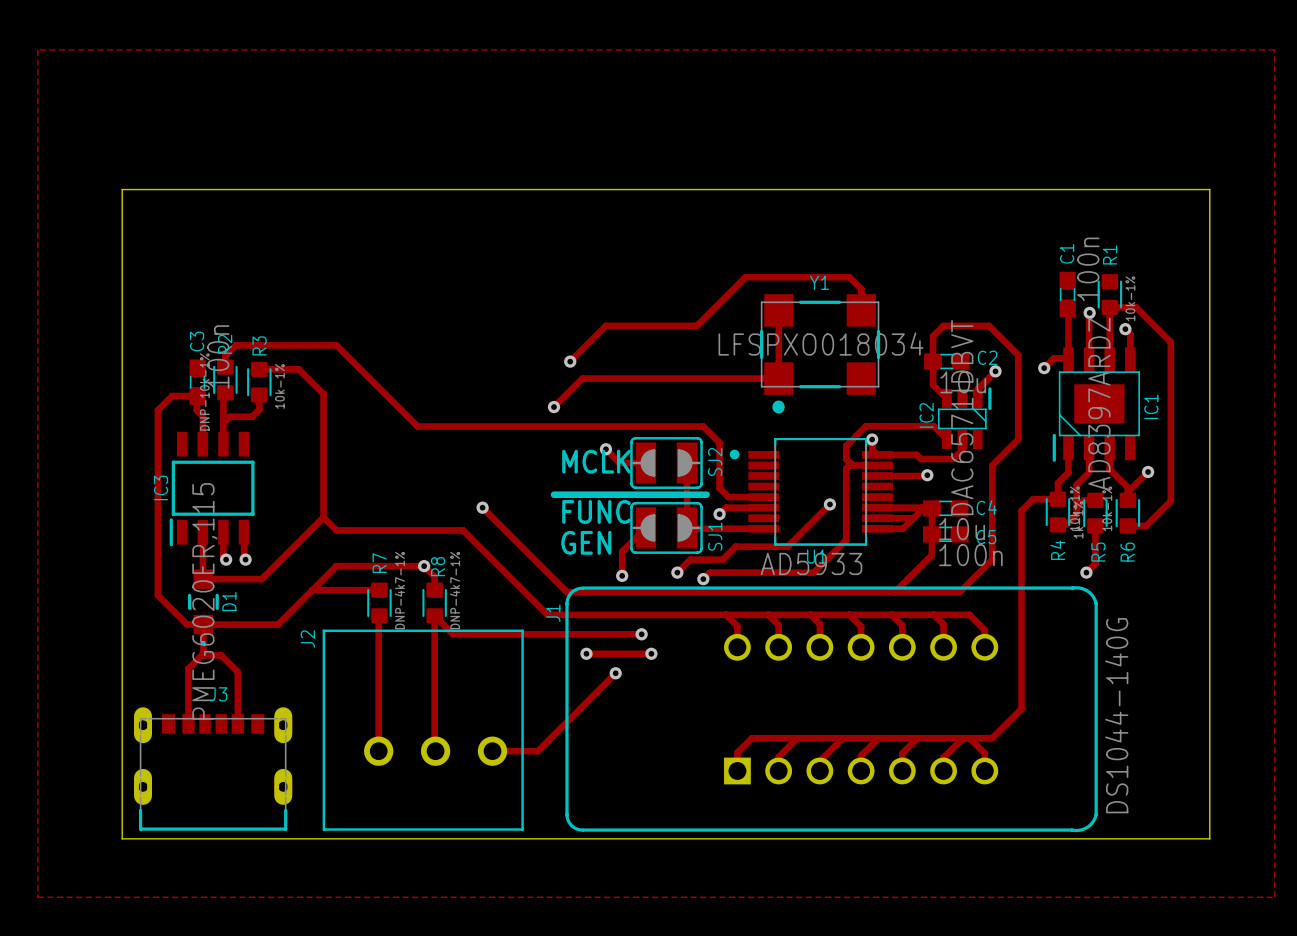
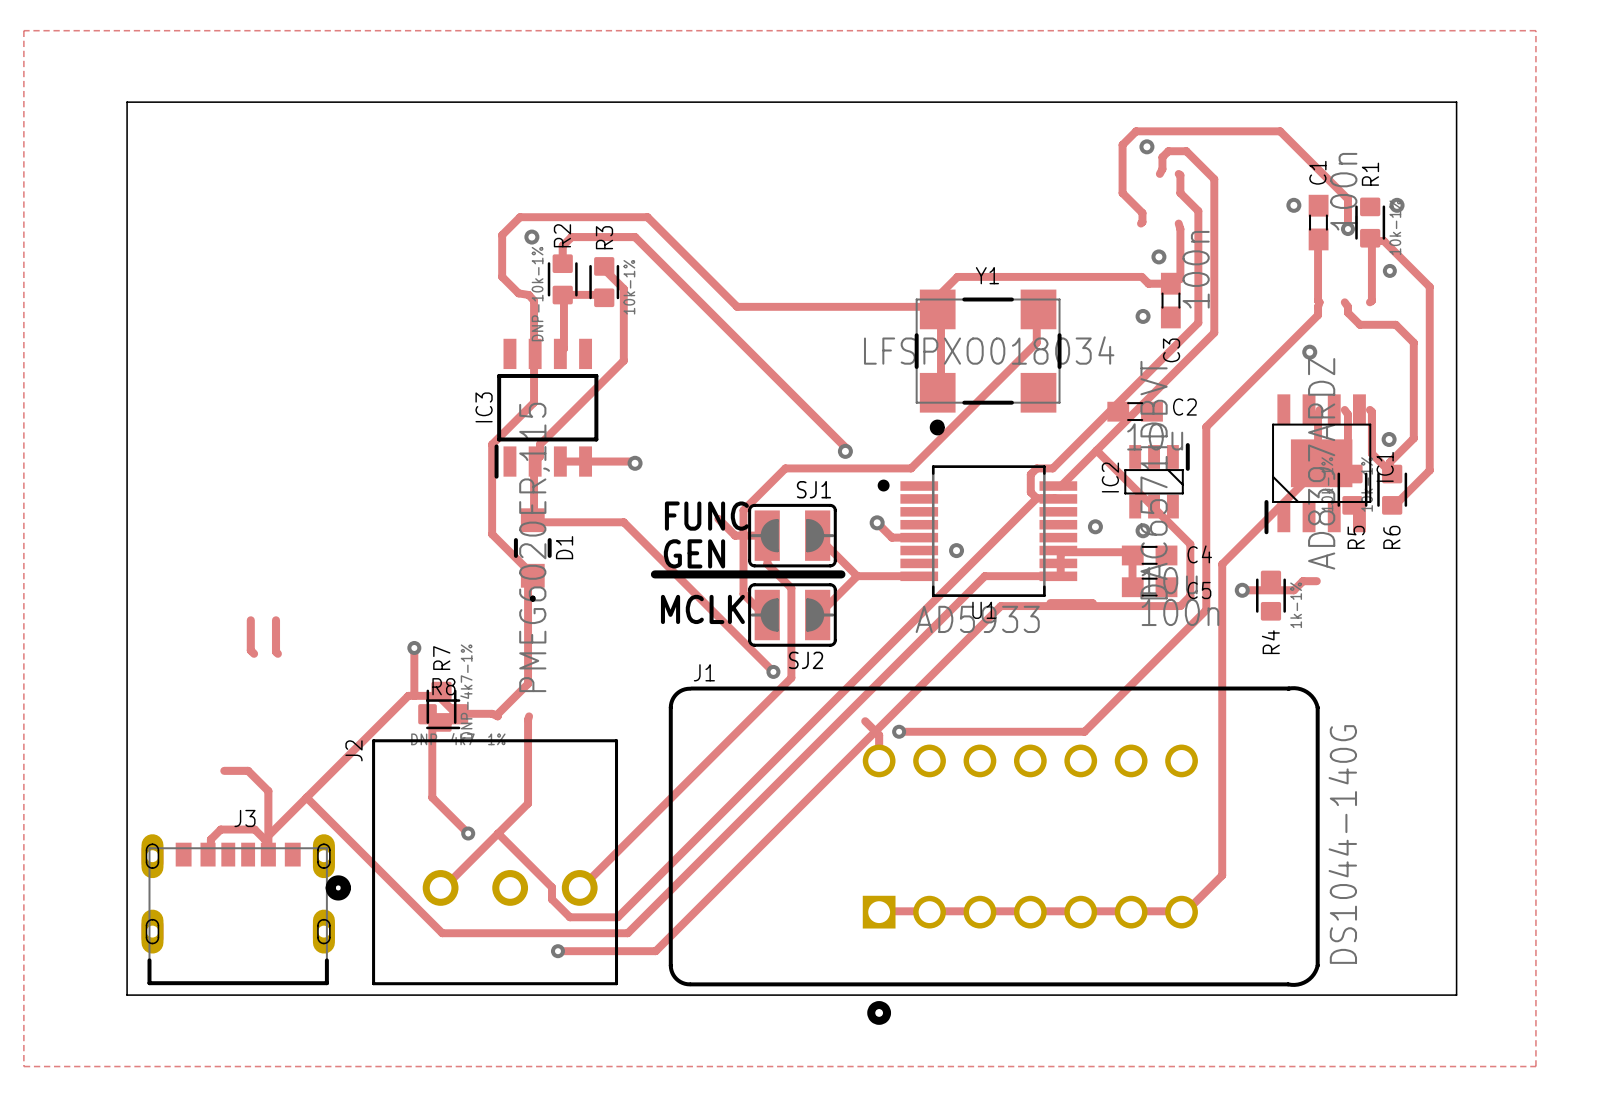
via: none -> (1146, 146)
track: none -> (1159, 173) (1162, 169) (1162, 157) (1168, 151) (1186, 151) (1214, 179) (1214, 332) (1060, 486) (1058, 486)
track: none -> (1178, 173) (1180, 175) (1180, 193) (1198, 211) (1198, 322) (1052, 468) (1036, 468) (1030, 474) (1030, 492) (1036, 498)
board edge: (122, 189) (1209, 189) -> (127, 201) (127, 102) (1456, 102) (1456, 201)
via: none -> (1293, 205)
via: none -> (1397, 205)
track: none -> (1140, 223) (1142, 213) (1122, 193) (1122, 144) (1136, 131) (1280, 131) (1347, 199) (1347, 229)
track: none -> (1178, 223) (1180, 229) (1180, 278) (1170, 283) (1148, 283) (1141, 276) (957, 276) (937, 296) (937, 309)
via: none -> (1347, 229)
via: none -> (531, 237)
track: none -> (1318, 239) (1318, 315) (1206, 426) (1206, 610) (1084, 731) (899, 731)
track: none -> (1371, 241) (1383, 241) (1429, 286) (1429, 470) (1395, 504) (1392, 505)
track: none -> (1371, 241) (1371, 300) (1369, 302)
via: none -> (1158, 256)
track: none -> (562, 263) (562, 245) (571, 237) (635, 237) (845, 447) (845, 451)
track: none -> (604, 266) (605, 270) (623, 288) (623, 360) (540, 444) (540, 456) (534, 462) (532, 520) (534, 522) (623, 522) (773, 671)
via: none -> (1389, 270)
track: none -> (604, 297) (599, 294) (562, 295) (563, 348) (560, 353)
track: none -> (1344, 302) (1347, 306) (1347, 312) (1359, 324) (1395, 324) (1413, 342) (1413, 438) (1389, 462) (1392, 474) (1371, 453) (1371, 411) (1369, 409)
track: none -> (937, 309) (941, 312) (941, 390) (937, 392)
via: none -> (1143, 316)
C1 position: (1067, 294) -> (1318, 222)
R1 position: (1109, 294) -> (1370, 222)
track: (1109, 307) (1136, 307) (1170, 342) (1170, 501) (1146, 525) (1127, 525) -> none
track: (1109, 307) (1109, 359) -> none
track: (1067, 308) (1068, 359) -> none
track: (778, 310) (778, 378) (582, 378) (554, 407) -> none
track: (861, 310) (861, 289) (849, 277) (745, 277) (696, 325) (605, 325) (570, 361) -> none
track: (1089, 312) (1089, 359) -> none
track: (1125, 329) (1130, 334) (1130, 359) -> none
via: (1125, 329) -> none
C3 name position: C3 (197, 341) -> C3 (1171, 350)
Y1 position: (820, 353) -> (988, 362)
track: (1068, 358) (1053, 358) (1044, 368) -> none
track: none -> (1344, 409) (1347, 414) (1347, 468) (1352, 474)
via: (570, 361) -> none
track: (225, 367) (225, 355) (235, 345) (336, 345) (417, 426) (703, 426) (719, 442) (719, 488) (728, 497) (763, 497) -> none
via: (1044, 368) -> none
track: (259, 369) (298, 369) (323, 394) (323, 517) -> none
track: (995, 371) (977, 389) (977, 398) -> none
via: (995, 371) -> none
R2 position: (225, 379) -> (562, 279)
C3 position: (197, 382) -> (1170, 300)
R3 position: (259, 382) -> (604, 282)
via: none -> (1389, 439)
track: (225, 392) (223, 394) (223, 444) -> none
track: none -> (1096, 450) (1190, 544) (1190, 596) (1180, 606) (1000, 606) (655, 951) (557, 951)
via: none -> (845, 451)
track: (259, 395) (259, 409) (252, 416) (229, 416) (223, 423) -> none
track: (946, 398) (933, 384) (933, 336) (943, 325) (989, 325) (1018, 355) (1018, 439) (992, 465) (992, 559) (959, 592) (566, 592) (482, 507) -> none
track: none -> (560, 461) (633, 461) (635, 463)
via position: (554, 407) -> (635, 463)
track: none -> (1036, 498) (617, 917) (569, 917) (551, 899) (551, 887) (498, 833)
via: (872, 439) -> none
track: (946, 439) (933, 426) (865, 426) (846, 446) (846, 459) (852, 465) (877, 465) -> none
track: (962, 439) (962, 450) (953, 459) (920, 459) (916, 454) (877, 454) (872, 449) (872, 439) -> none
track: (202, 444) (202, 416) (196, 410) (197, 396) (172, 396) (157, 410) (157, 595) (187, 624) (278, 624) (336, 566) (424, 566) (434, 576) (434, 590) -> none
track: (1068, 447) (1068, 472) (1057, 483) (1057, 499) (1033, 499) (1021, 510) (1021, 708) (992, 738) (752, 738) (737, 752) (737, 770) -> (1319, 409) (1318, 468) (1222, 564) (1222, 875) (1186, 911) (1181, 912) (879, 912)
track: (1089, 447) (1089, 472) (1076, 484) (1076, 514) (1065, 524) (1057, 524) -> none
track: (1109, 447) (1109, 469) (1127, 487) (1127, 500) -> none
via: (605, 449) -> none
track: none -> (877, 522) (891, 537) (919, 537)
via: none -> (877, 522)
via: none -> (1095, 526)
via: none -> (1143, 530)
text position: MCLK (596, 461) -> MCLK (702, 609)
track: (687, 462) (687, 528) (763, 528) -> (817, 535) (857, 576)
SJ2 name rotation: 0° (715, 462) -> 90° clockwise (806, 660)
SJ2 name position: SJ2 (715, 462) -> SJ2 (806, 660)
track: (851, 463) (846, 468) (846, 540) (813, 572) (709, 572) (703, 579) -> none
track: (1148, 471) (1127, 492) -> none
via: (1148, 471) -> none
via: none -> (956, 550)
track: (927, 475) (877, 475) -> none
via: (927, 475) -> none
IC3 position: (212, 489) -> (546, 408)
U1 position: (811, 491) -> (977, 531)
track: none -> (857, 576) (919, 576)
track: none -> (857, 576) (817, 615)
track: (829, 504) (787, 546) (735, 546) (722, 559) (690, 559) (677, 572) -> none
via: (829, 504) -> none
track: none -> (1132, 587) (1132, 552) (1060, 552) (1060, 576) (984, 576) (627, 933) (442, 933) (306, 797)
via: (482, 507) -> none
track: (763, 507) (726, 507) (719, 514) -> none
track: (877, 507) (923, 508) -> none
track: none -> (1242, 590) (1293, 590)
via: none -> (1242, 590)
track: (923, 508) (931, 508) (931, 555) (894, 592) -> none
track: (923, 508) (903, 528) (877, 528) -> none
C4 position: (945, 508) -> (1149, 555)
text position: FUNC (596, 511) -> FUNC (706, 516)
R5 position: (1095, 513) -> (1352, 489)
R6 position: (1127, 513) -> (1392, 489)
via: (719, 514) -> none
track: (323, 517) (261, 579) (203, 579) (202, 532) -> none
track: (323, 517) (336, 530) (463, 530) (547, 614) (969, 614) (984, 630) (984, 647) -> none
track: (1095, 525) (1095, 563) (1086, 572) -> none
track: (645, 527) (622, 551) (622, 575) -> (767, 615) (761, 612) (743, 594) (743, 510) (785, 468) (911, 468) (1036, 342) (1036, 312) (1038, 309)
C5 position: (945, 534) -> (1149, 587)
SJ1 name rotation: 0° (715, 536) -> 90° clockwise (813, 489)
SJ1 name position: SJ1 (715, 536) -> SJ1 (813, 489)
text position: GEN (586, 542) -> GEN (694, 553)
track: none -> (414, 647) (414, 695)
via: none -> (414, 647)
via: (226, 559) -> none
via: (245, 559) -> none
via: (424, 566) -> none
via: (677, 572) -> none
via: (1086, 572) -> none
via: none -> (773, 671)
via: (622, 575) -> none
via: (703, 579) -> none
J1 footprint: [565, 586, 1098, 833] -> [668, 686, 1320, 1025]
track: (312, 590) (379, 590) -> none
R8 rotation: 0° (434, 602) -> 90° clockwise (443, 714)
R8 position: (434, 602) -> (443, 714)
D1 position: (203, 607) -> (532, 554)
track: none -> (427, 714) (432, 719) (432, 797) (468, 833)
J1 name position: J1 (553, 613) -> J1 (704, 672)
track: (768, 614) (778, 625) (778, 647) -> none
track: (810, 614) (819, 624) (819, 647) -> none
track: (849, 614) (861, 626) (861, 647) -> none
track: (891, 614) (902, 625) (902, 647) -> none
track: (933, 614) (943, 624) (943, 647) -> none
track: (379, 615) (378, 751) -> (529, 716) (528, 803) (444, 887) (440, 887)
via: none -> (899, 731)
track: (203, 624) (203, 653) (188, 668) (188, 723) -> (937, 309) (935, 306) (737, 306) (647, 217) (520, 217) (502, 235) (502, 276) (518, 293) (528, 295) (534, 300) (534, 402) (492, 444) (492, 534) (532, 575) (528, 576) (528, 683) (497, 716) (492, 713) (456, 713) (438, 695) (408, 695) (264, 839) (254, 829) (220, 829) (210, 839) (210, 851) (208, 854)
J2 footprint: [322, 629, 524, 831] -> [325, 739, 619, 986]
track: (641, 634) (453, 634) (434, 615) (435, 751) -> none
via: (641, 634) -> none
track: (586, 653) (651, 653) -> none
via: (586, 653) -> none
via: (651, 653) -> none
track: (615, 673) (537, 751) (492, 751) -> (767, 535) (767, 564) (791, 588) (791, 677) (579, 887)
via: (615, 673) -> none
via: none -> (468, 833)
track: (797, 738) (778, 757) (778, 770) -> none
track: (842, 738) (819, 761) (819, 770) -> none
track: (878, 738) (861, 755) (861, 770) -> none
track: (917, 738) (902, 753) (902, 770) -> none
track: (963, 738) (943, 757) (943, 770) -> none
track: (969, 738) (984, 753) (984, 770) -> none
via: none -> (557, 951)

